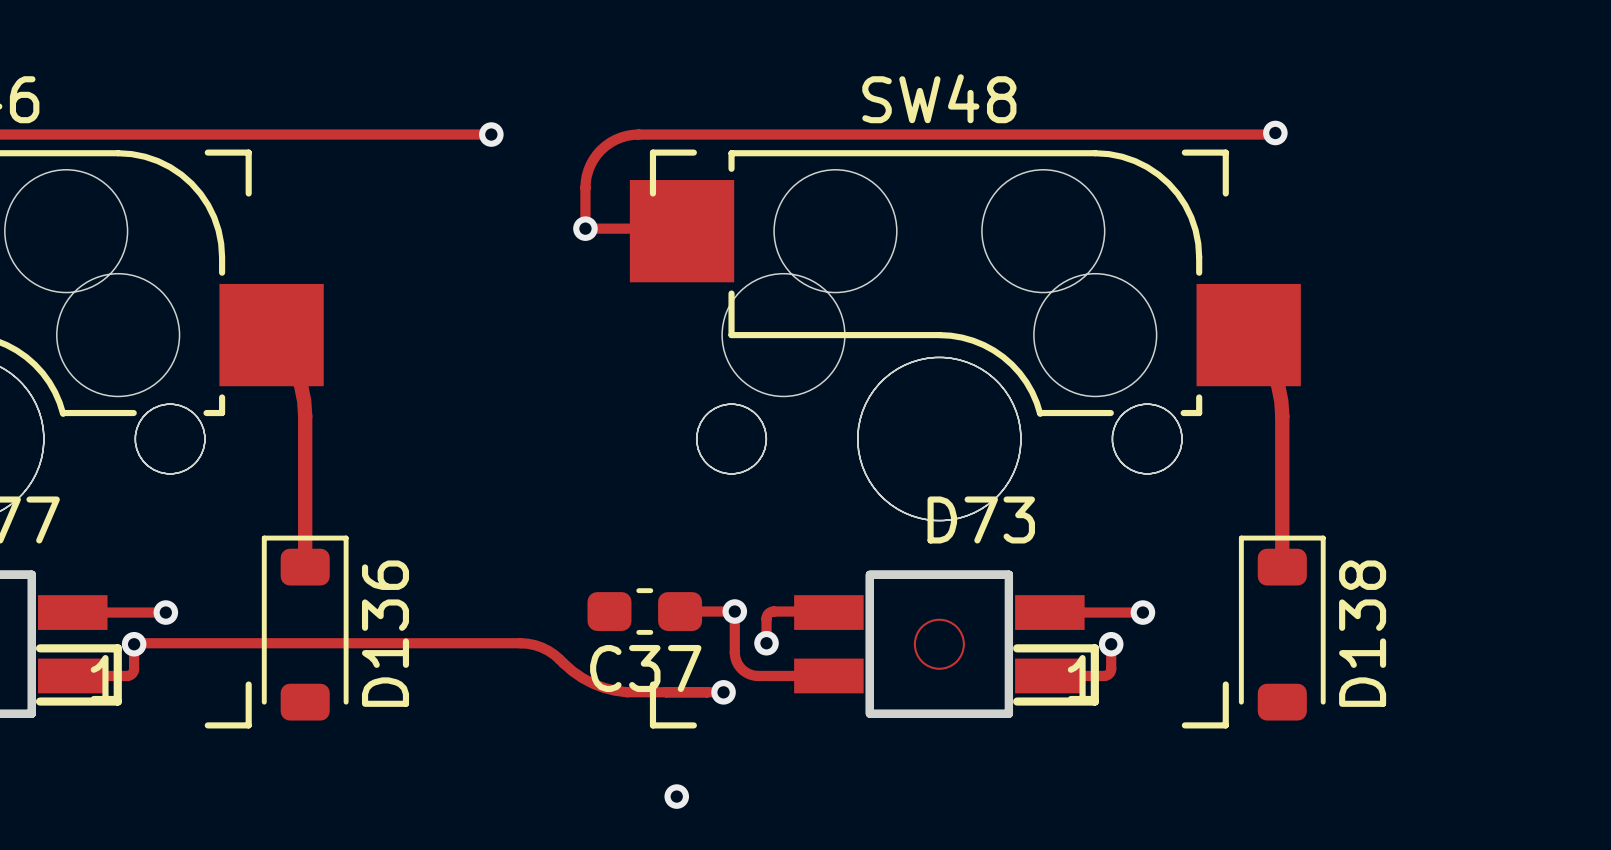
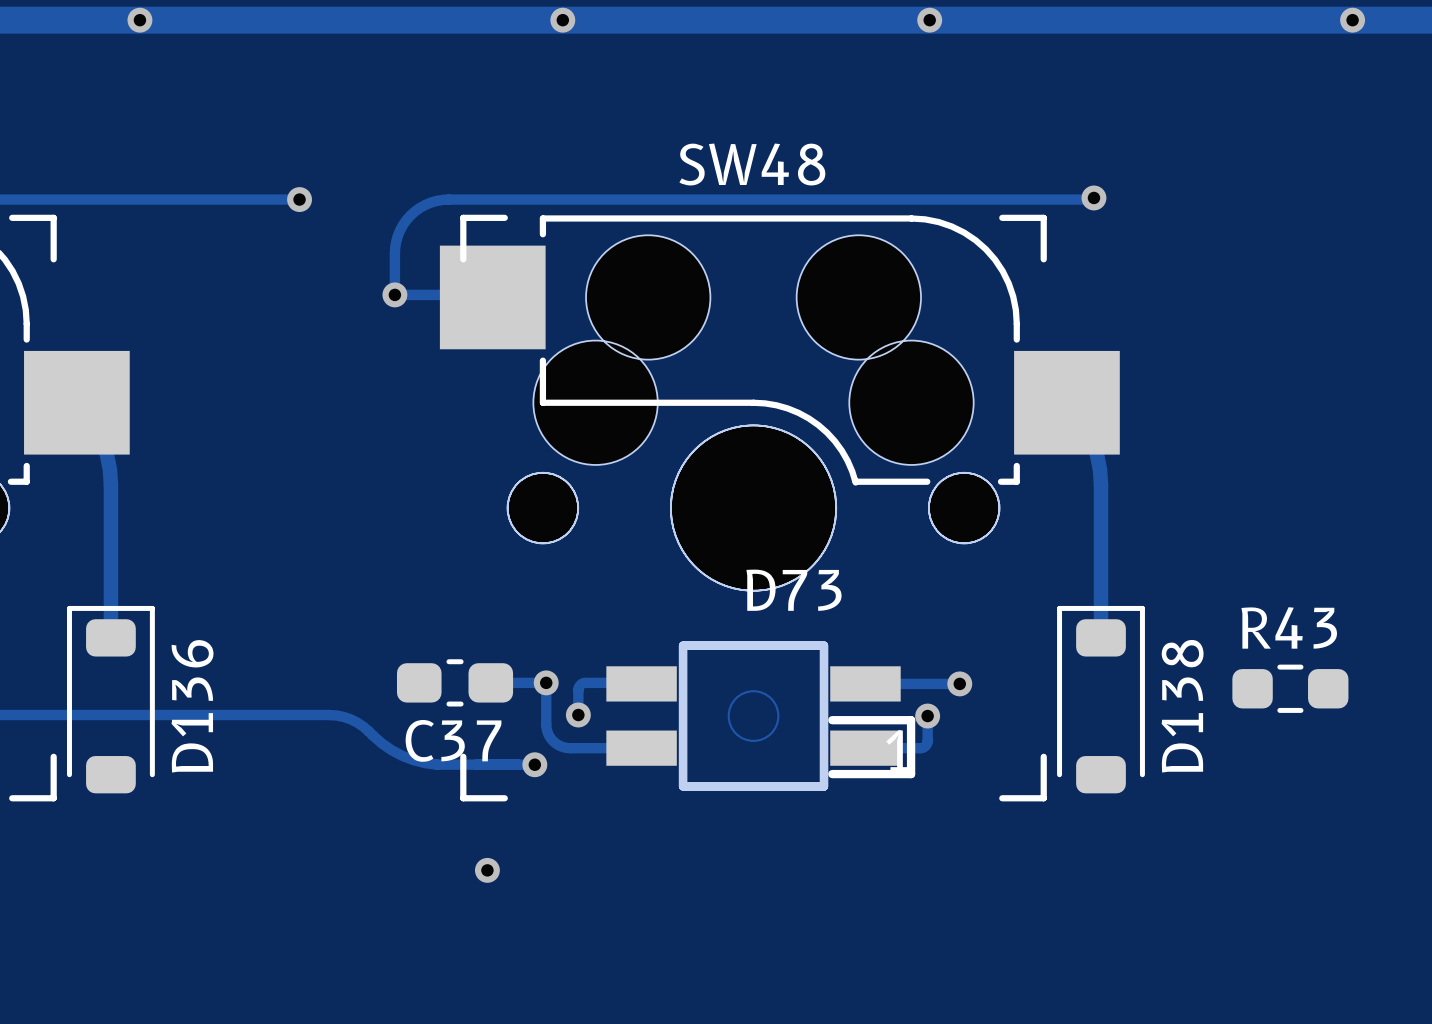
R43: none -> (1290, 688)

